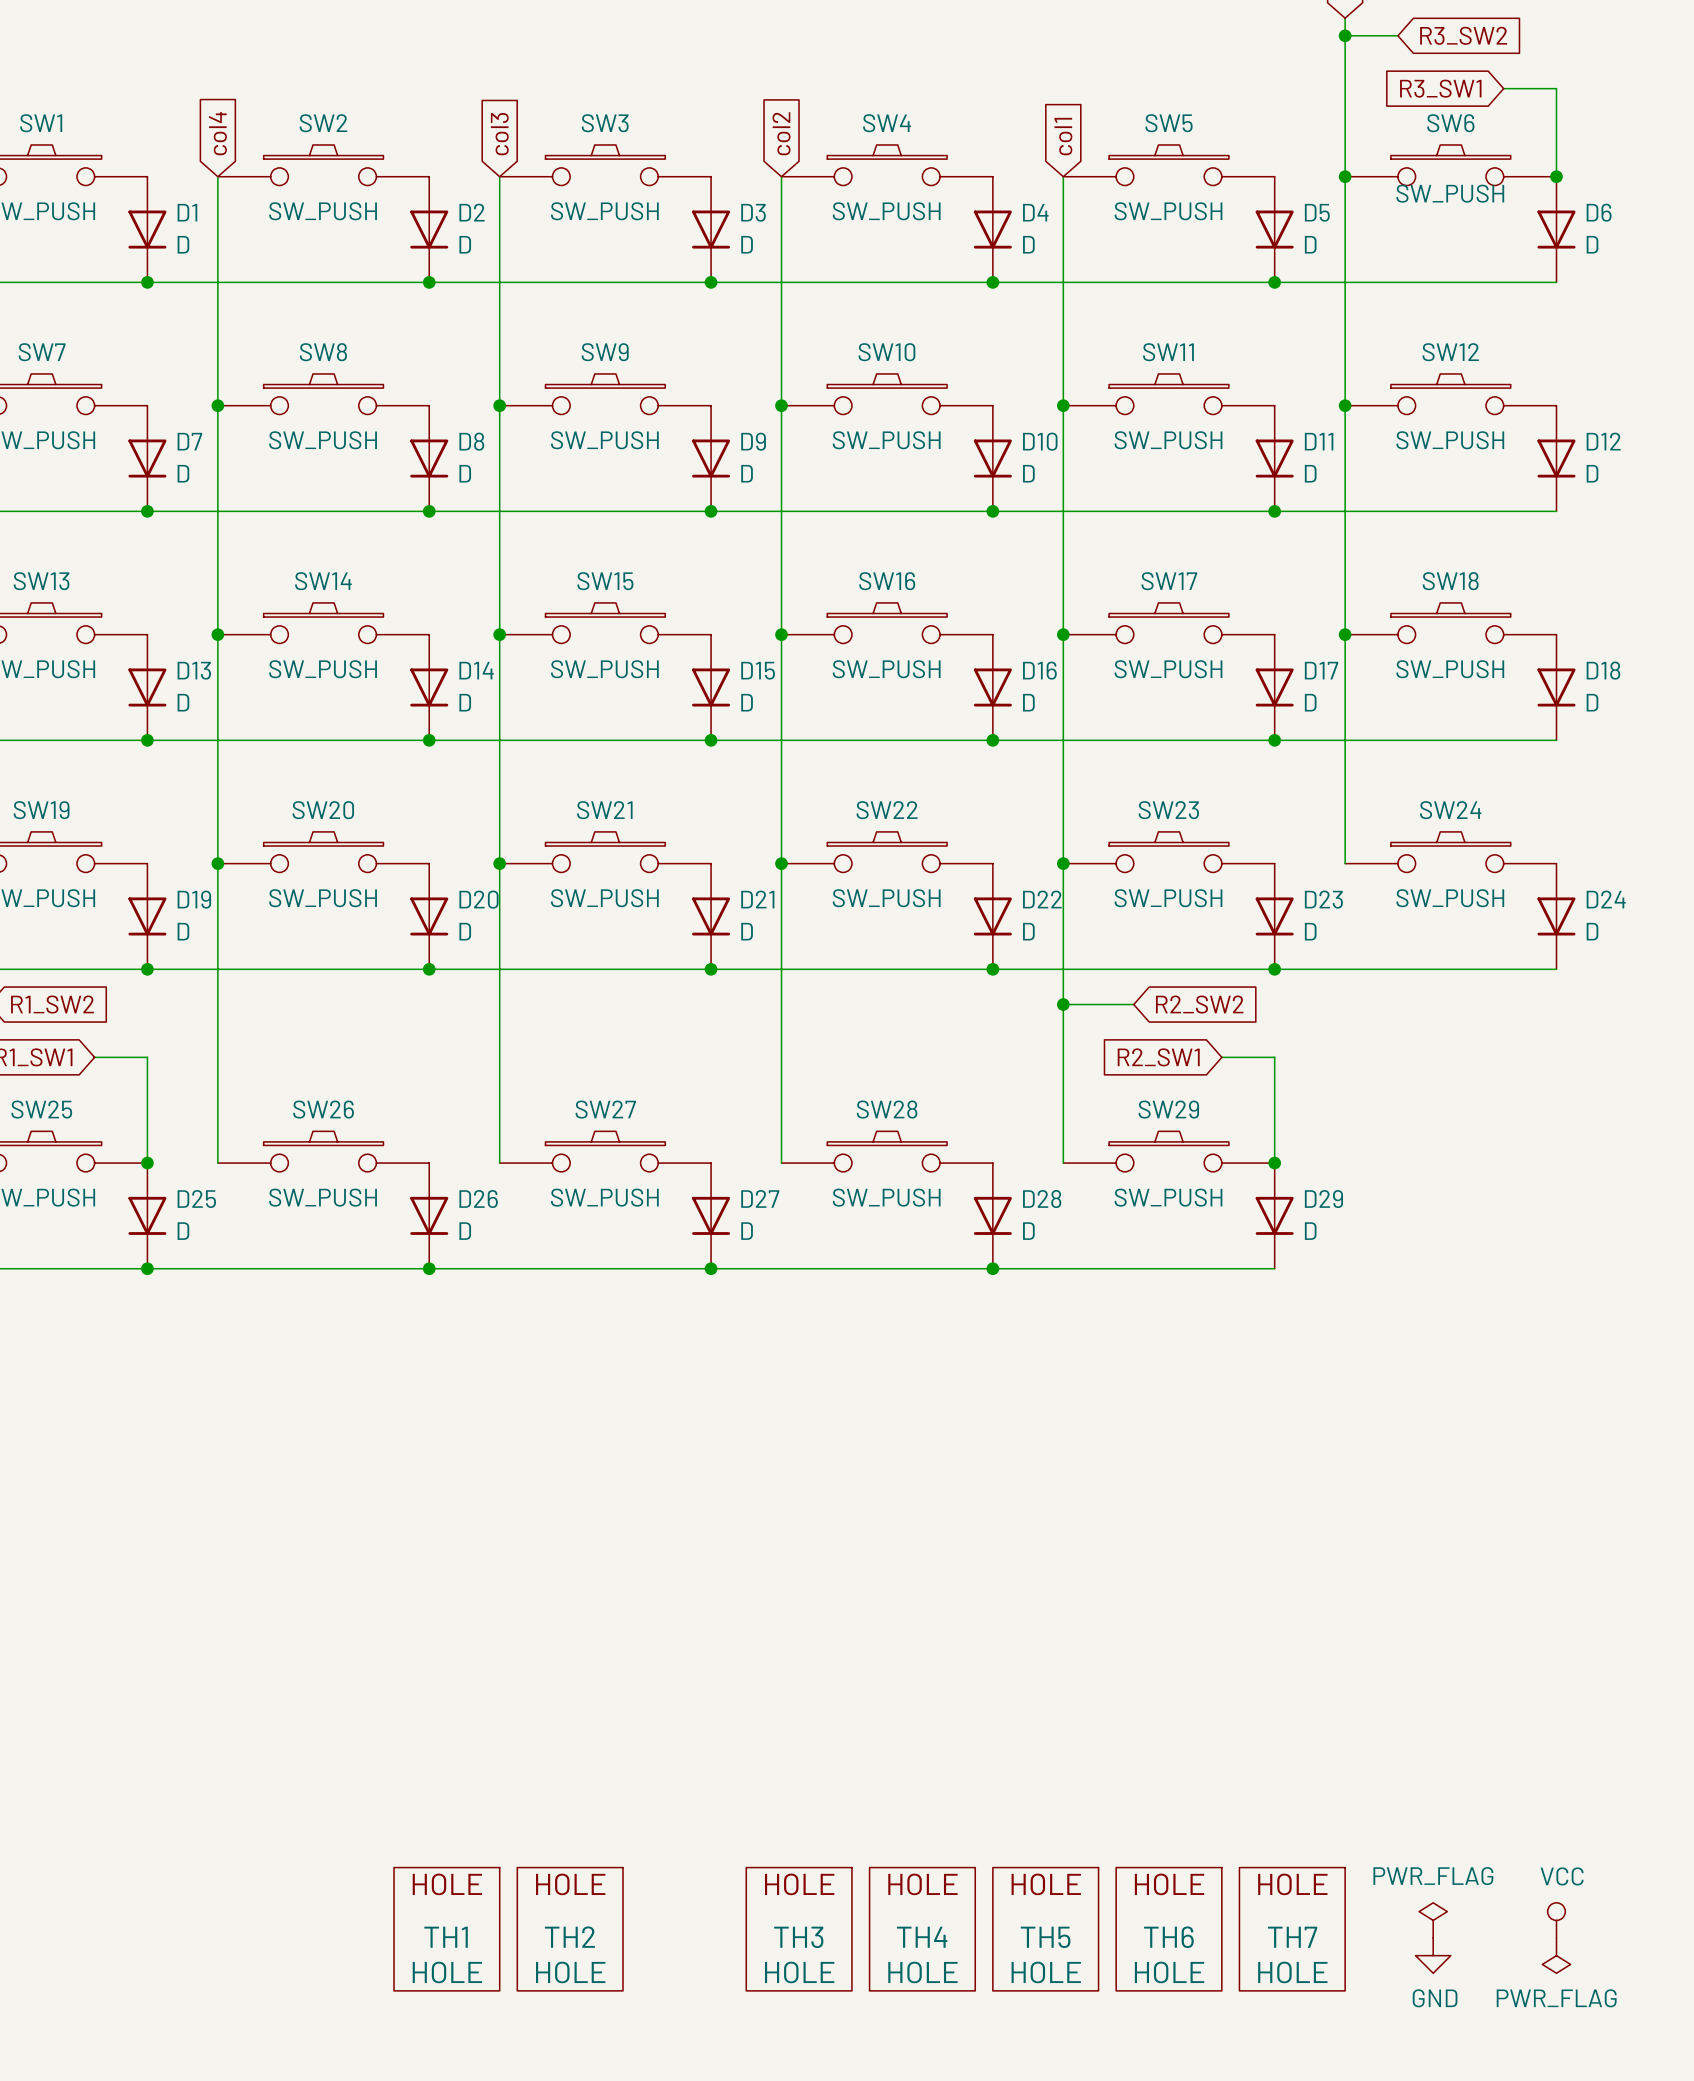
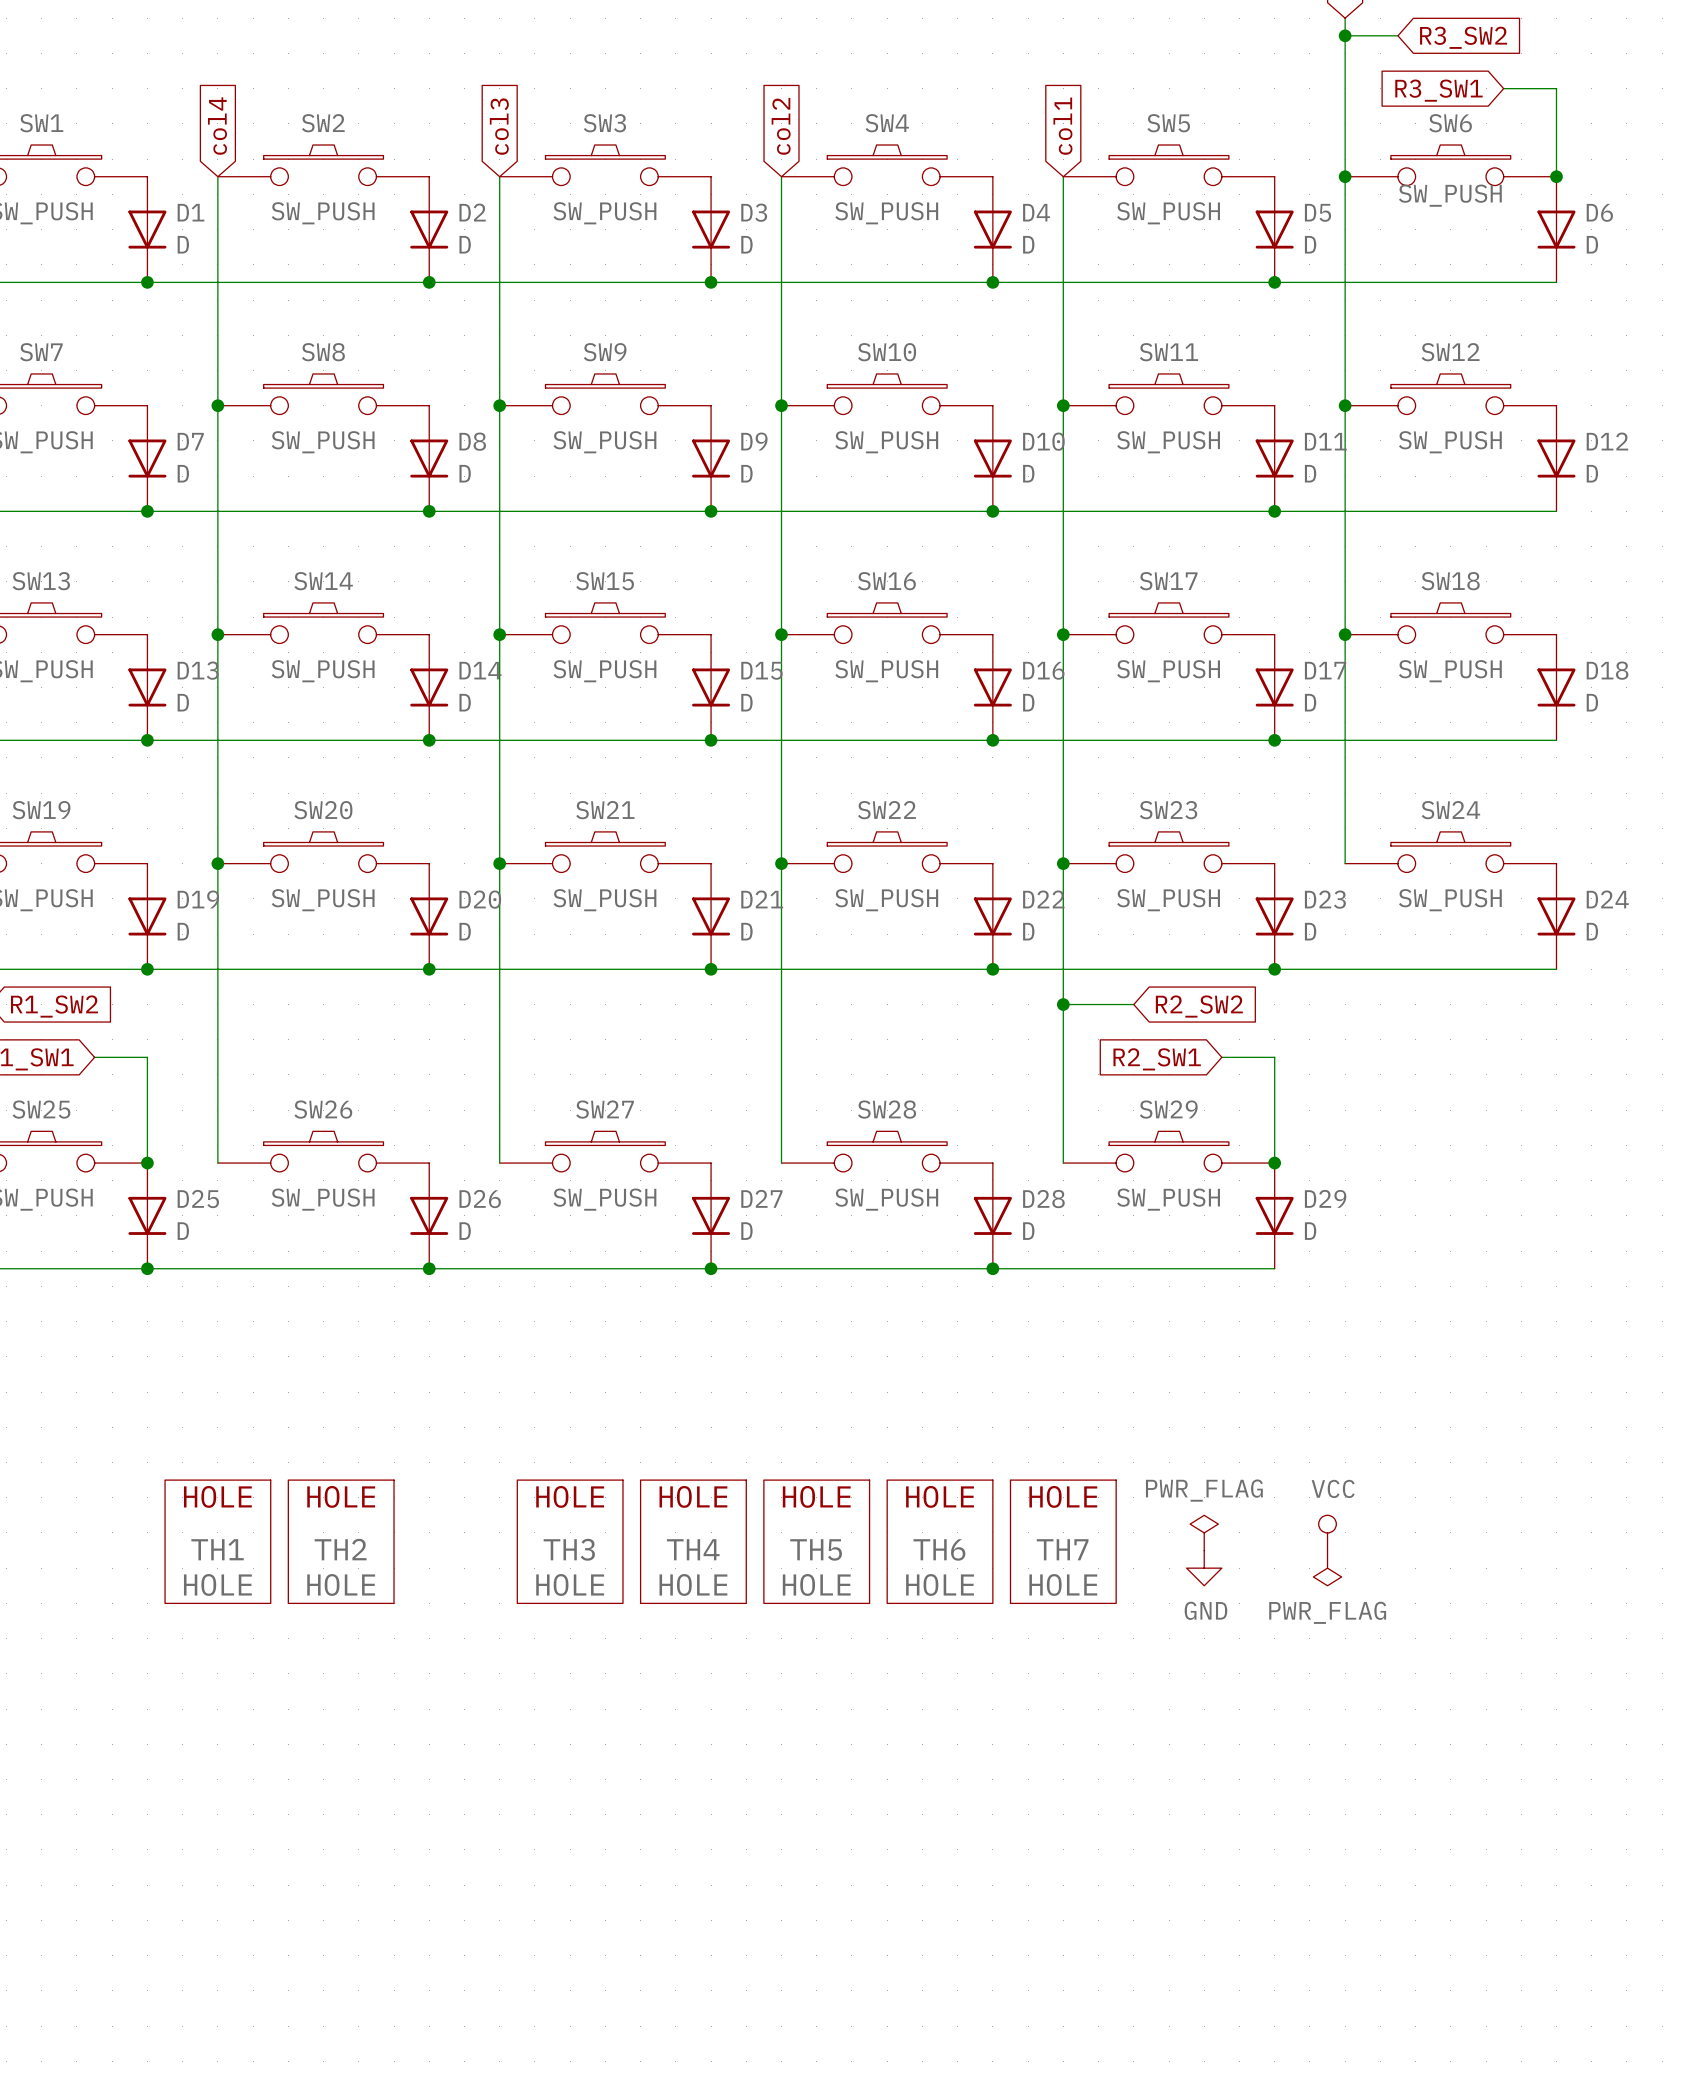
power symbol: none -> PWR_FLAG (1204, 1532)
power symbol: none -> VCC (1327, 1532)
power symbol: none -> GND (1204, 1568)
power symbol: none -> PWR_FLAG (1327, 1568)
power symbol: PWR_FLAG (1433, 1920) -> none
power symbol: VCC (1556, 1920) -> none
TH1 position: (446, 1929) -> (217, 1541)
TH2 position: (570, 1929) -> (341, 1541)
TH3 position: (799, 1929) -> (570, 1541)
TH4 position: (922, 1929) -> (693, 1541)
TH5 position: (1045, 1929) -> (816, 1541)
TH6 position: (1169, 1929) -> (940, 1541)
TH7 position: (1292, 1929) -> (1063, 1541)
power symbol: GND (1433, 1955) -> none
power symbol: PWR_FLAG (1556, 1955) -> none

